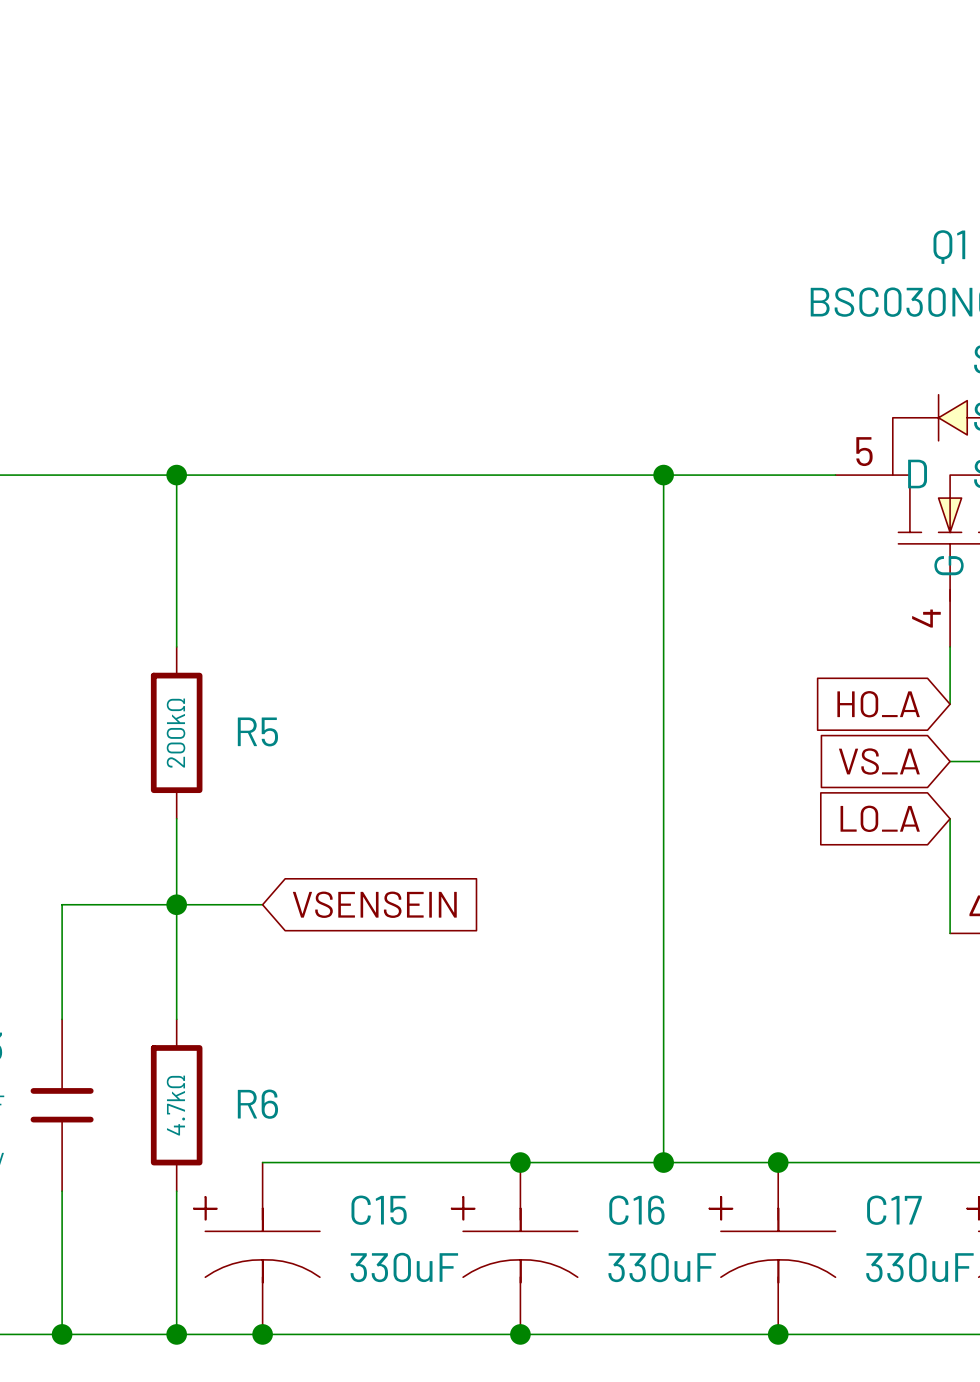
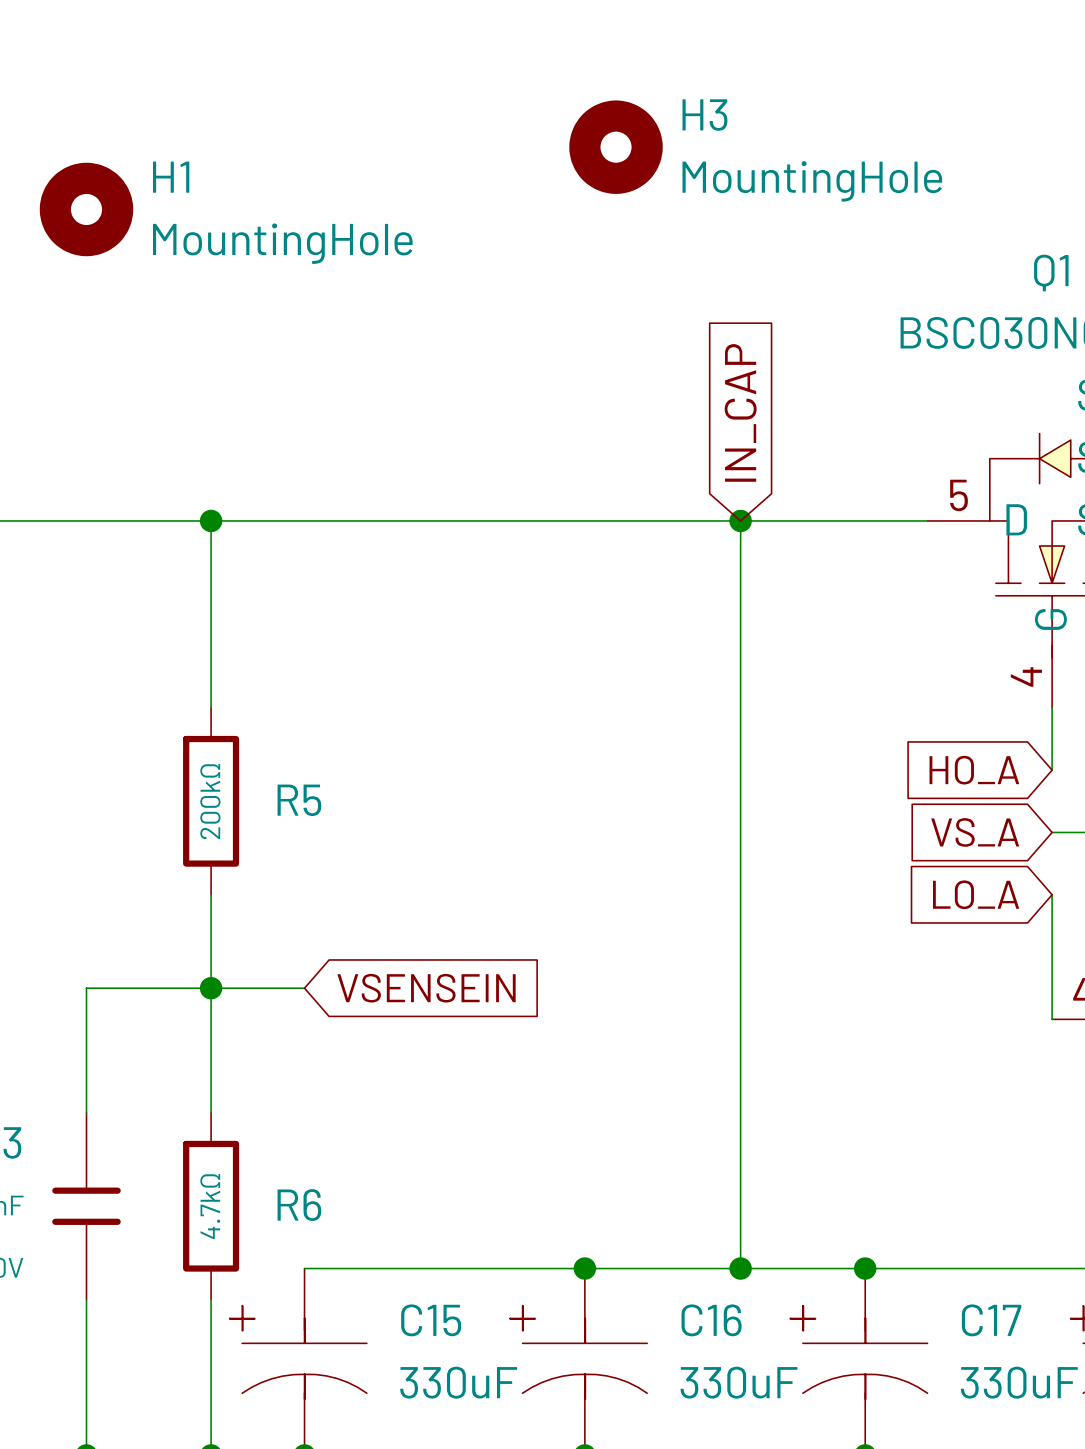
H3: none -> MountingHole (616, 147)
H1: none -> MountingHole (86, 209)
global label: none -> IN_CAP (740, 412)

